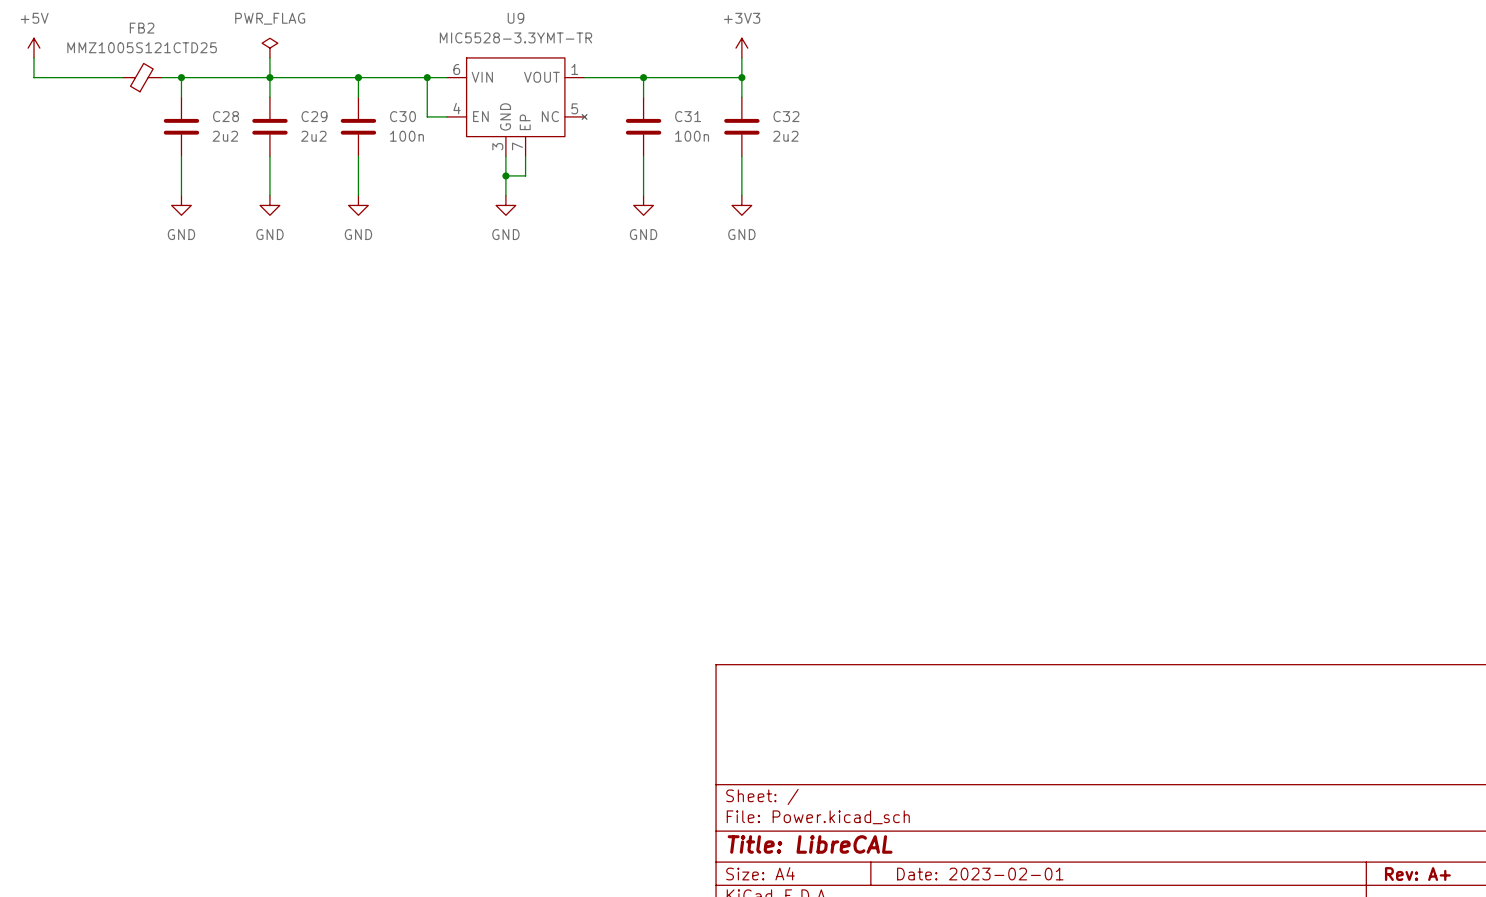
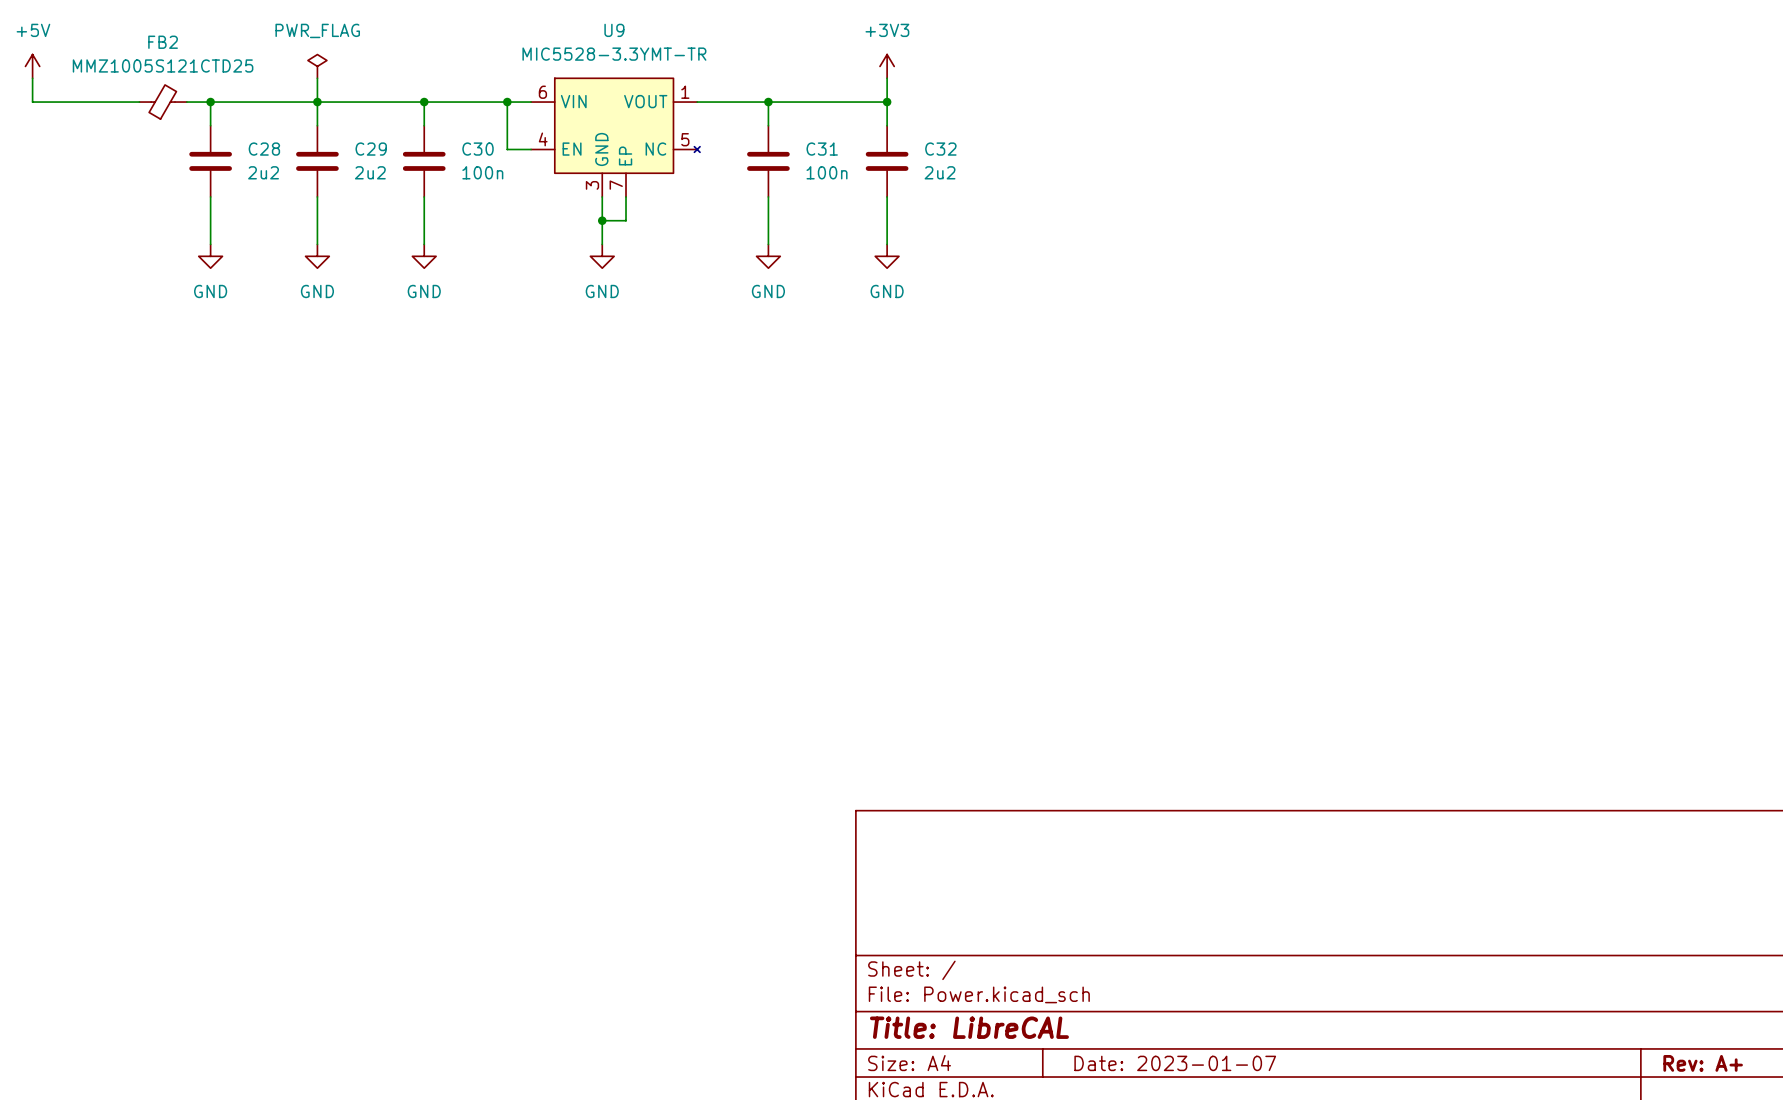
title block: Date: 2023-02-01 (980, 874) -> Date: 2023-01-07 (1175, 1063)

